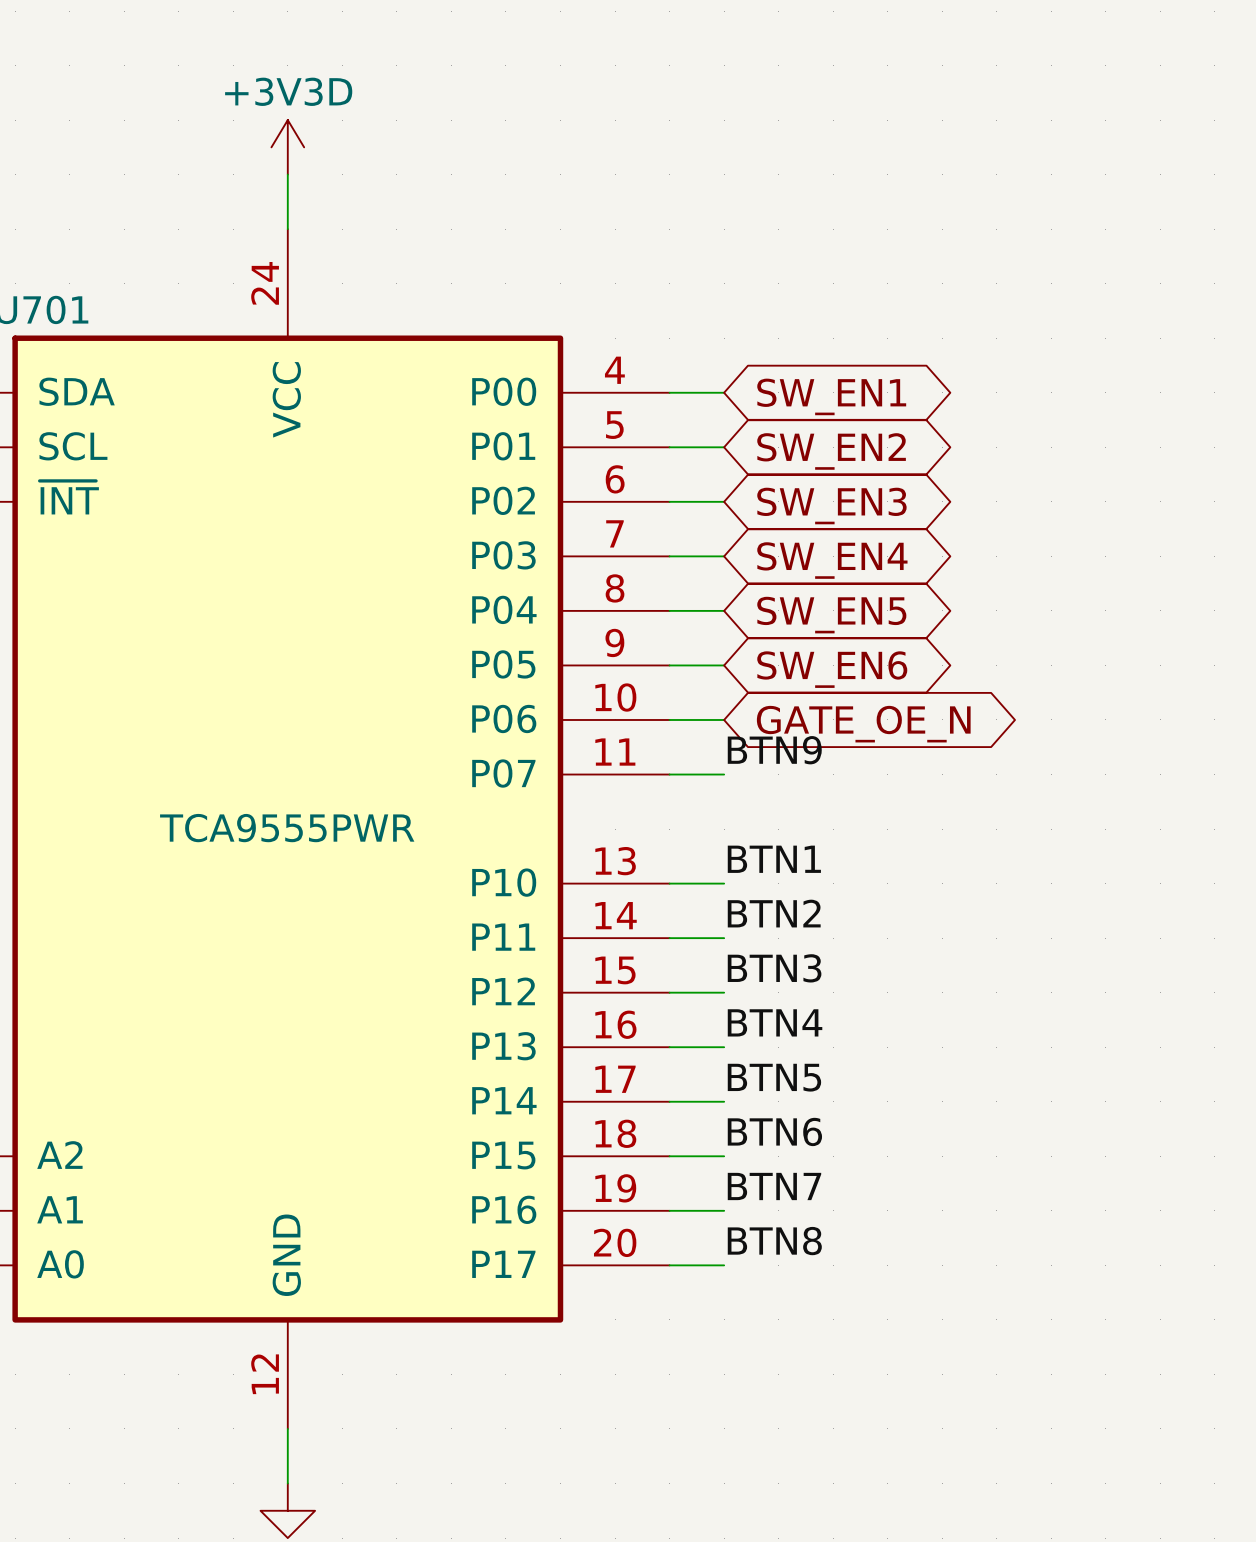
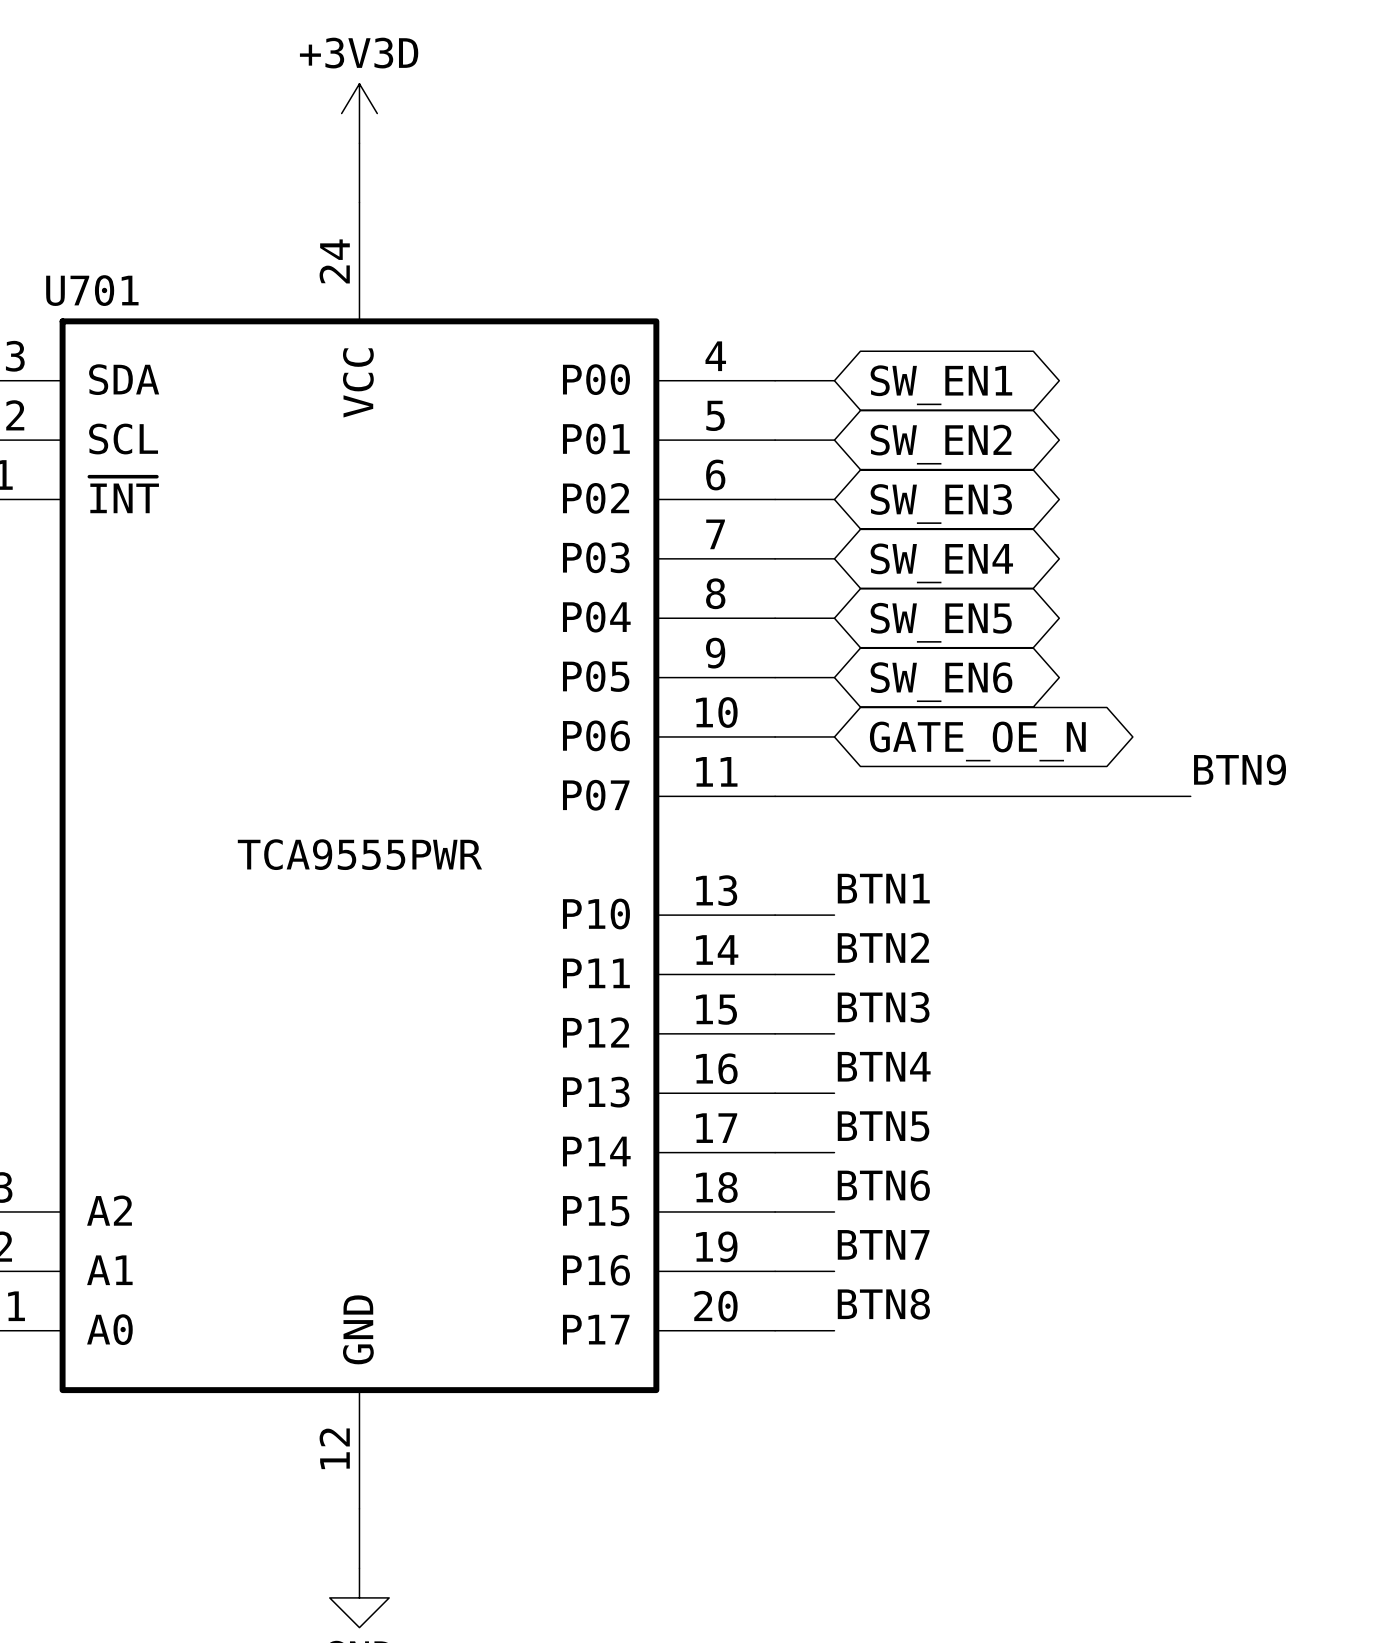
label position: BTN9 (774, 750) -> BTN9 (1240, 769)
wire: none -> (834, 796) (1190, 796)

